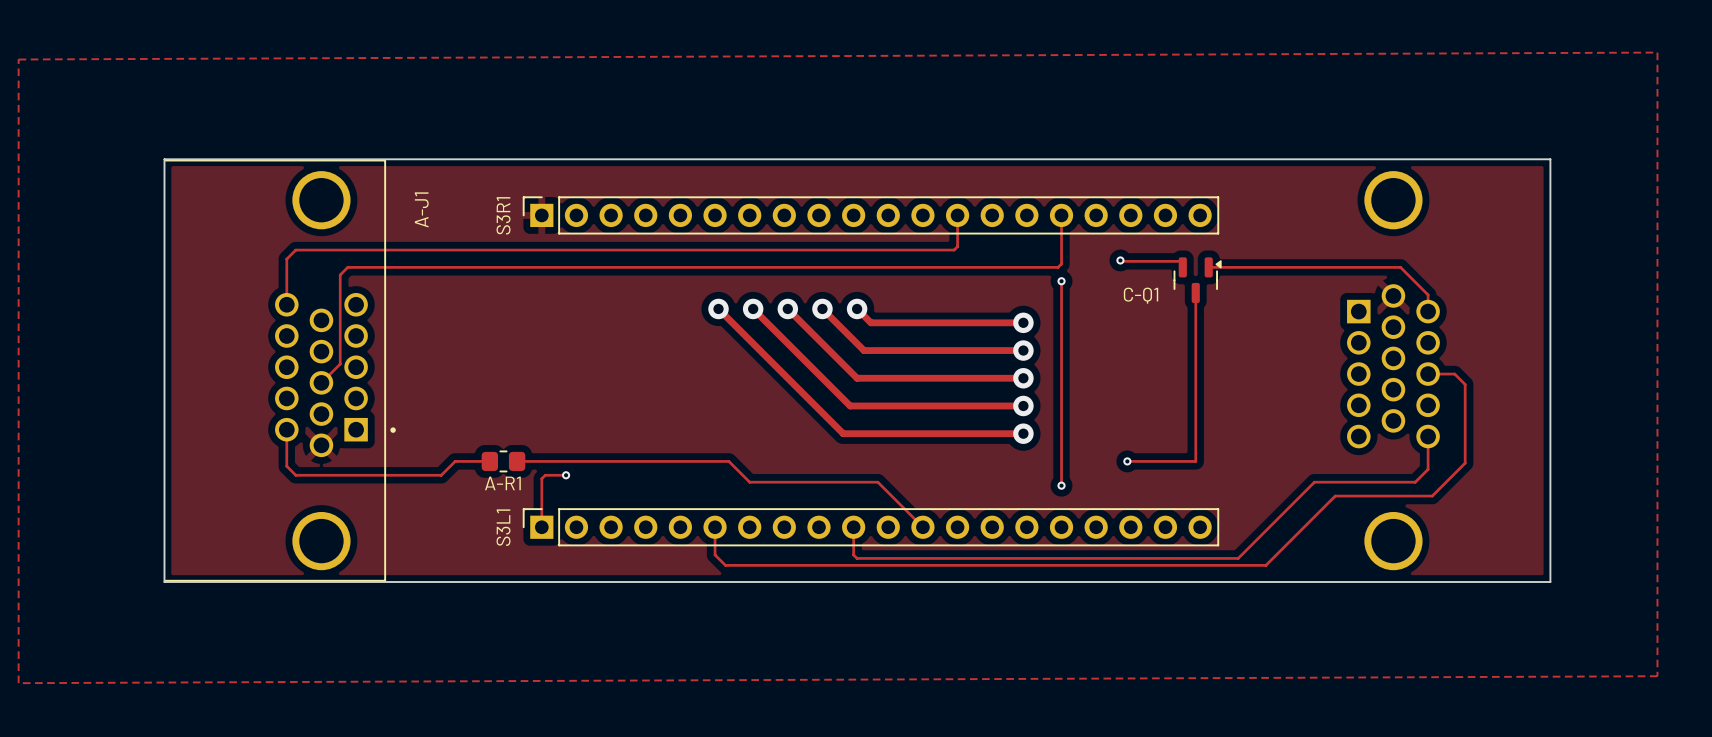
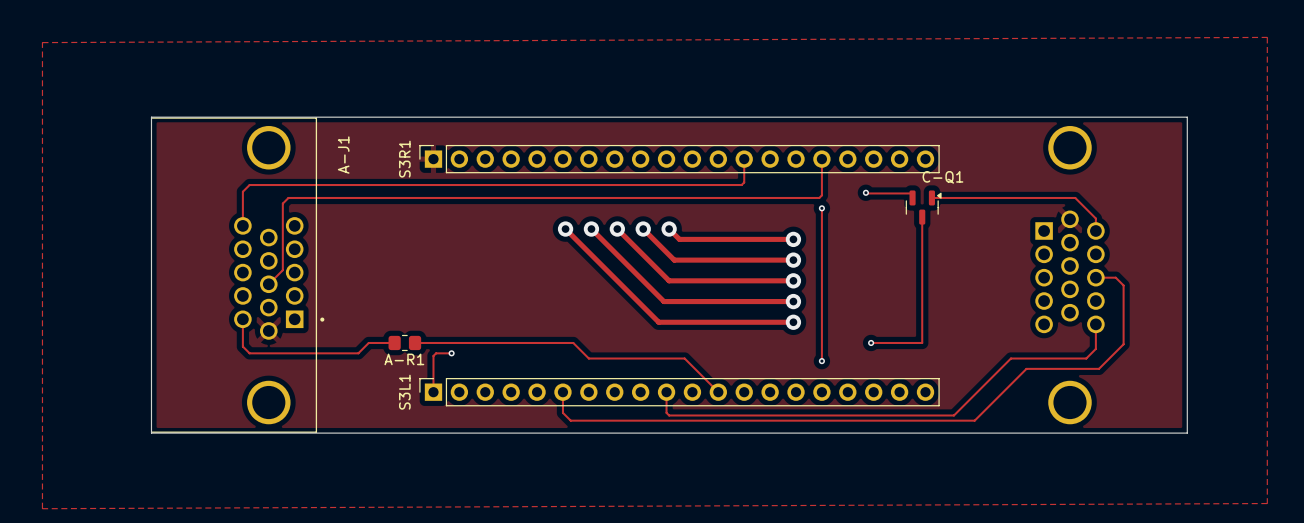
C-Q1 name position: C-Q1 (1141, 295) -> C-Q1 (942, 177)

